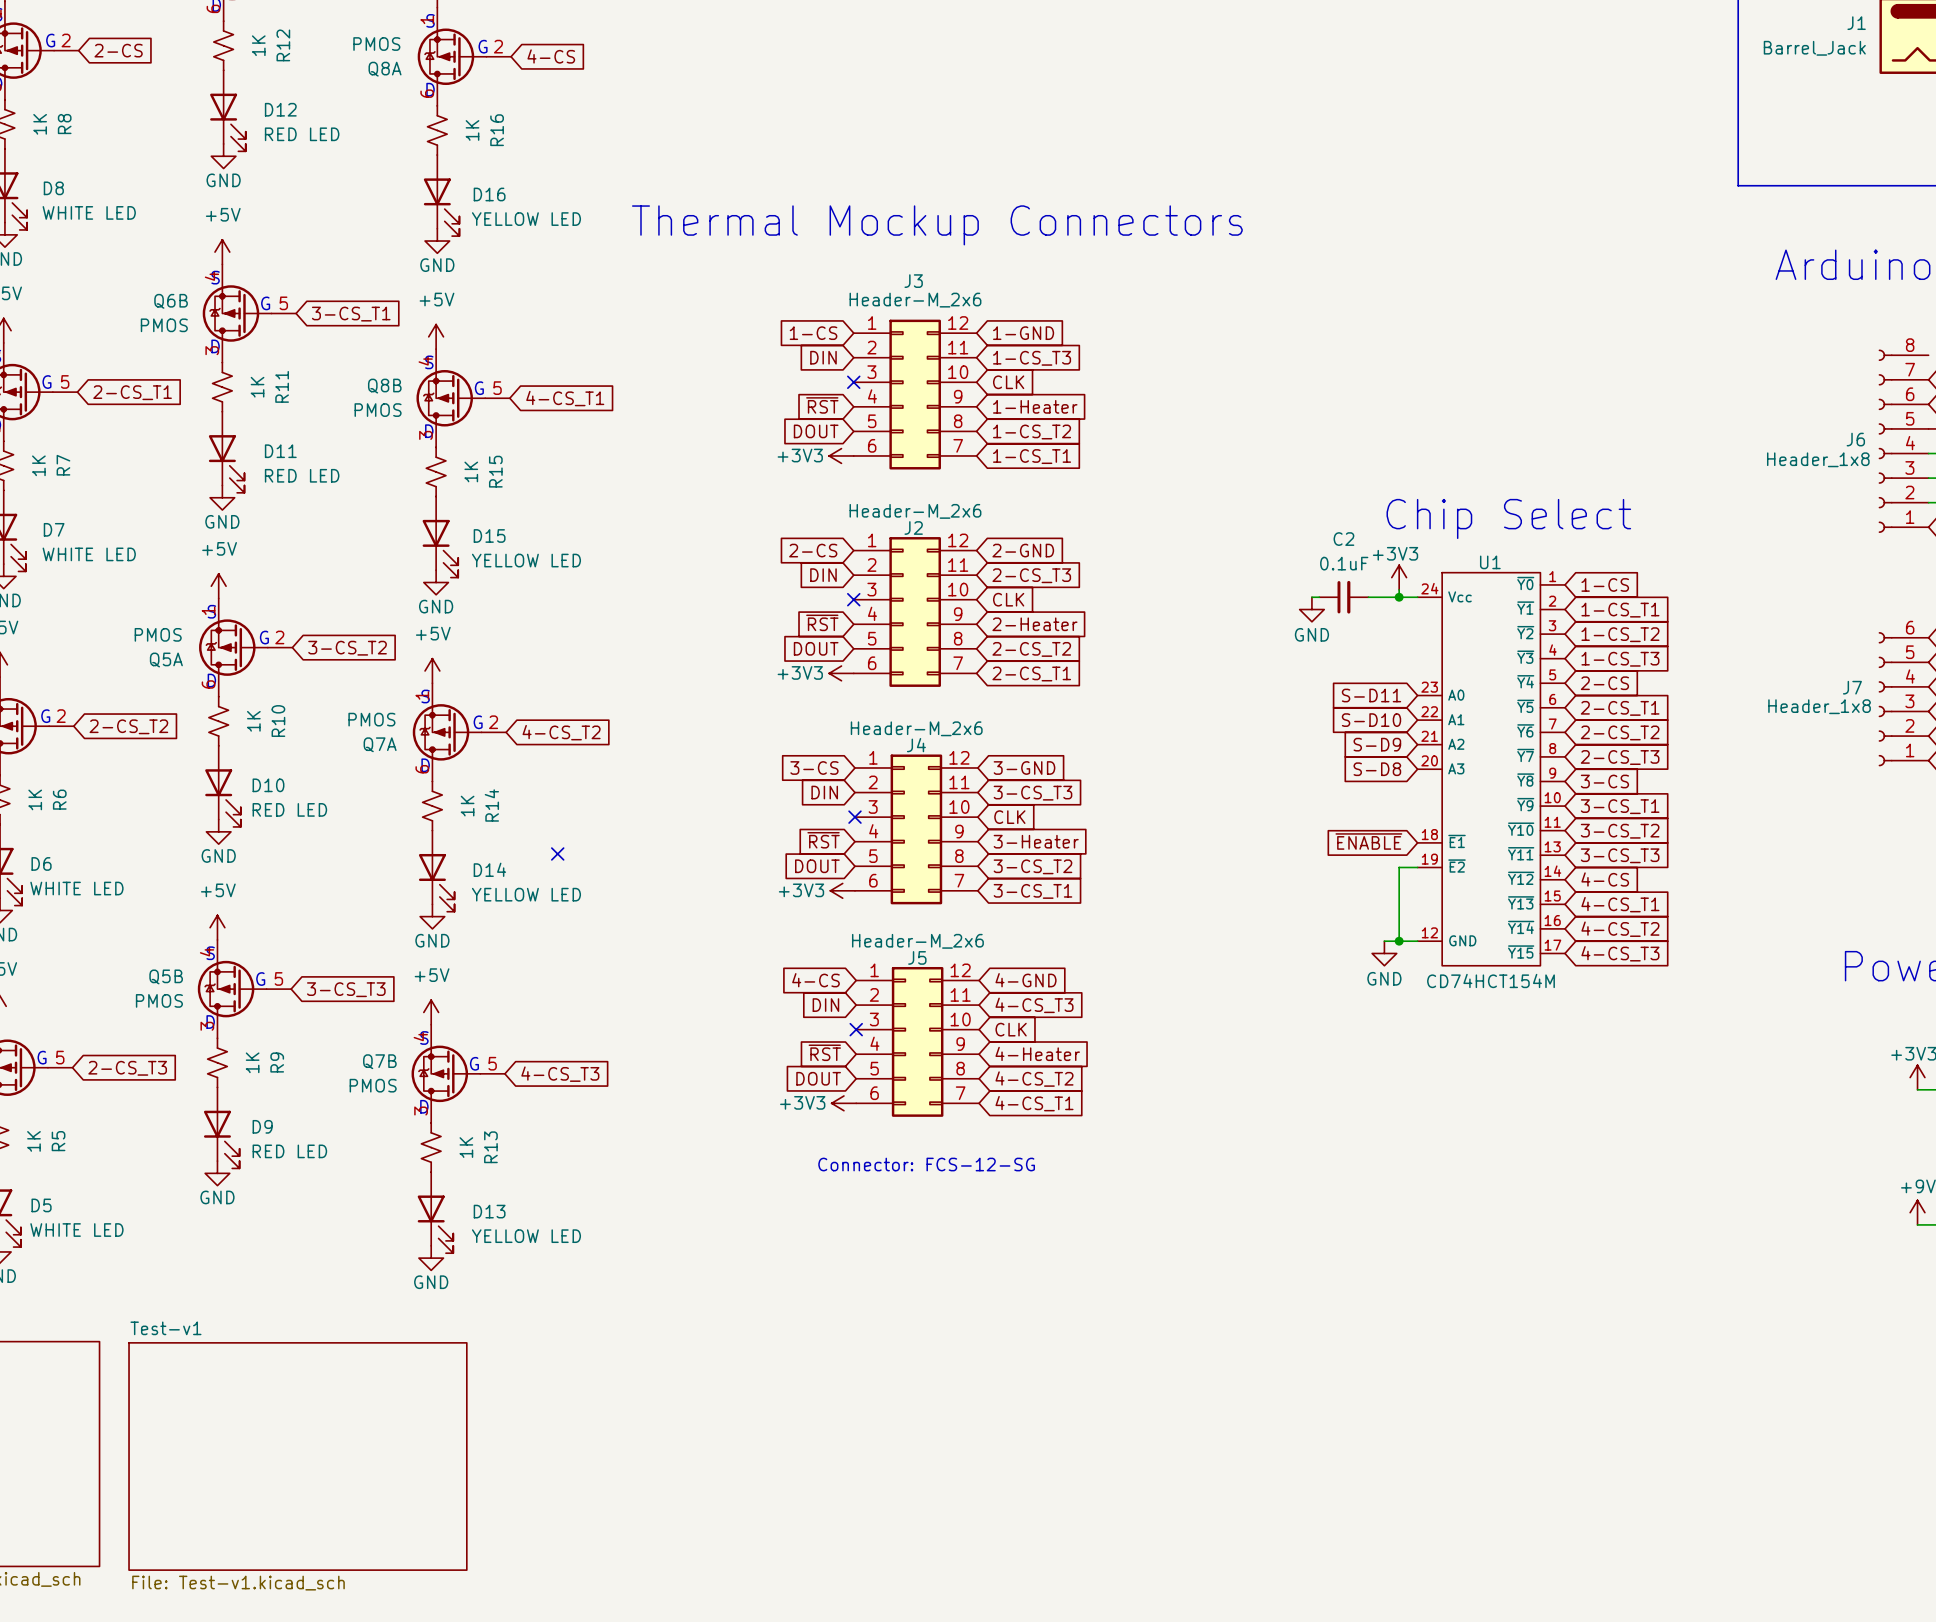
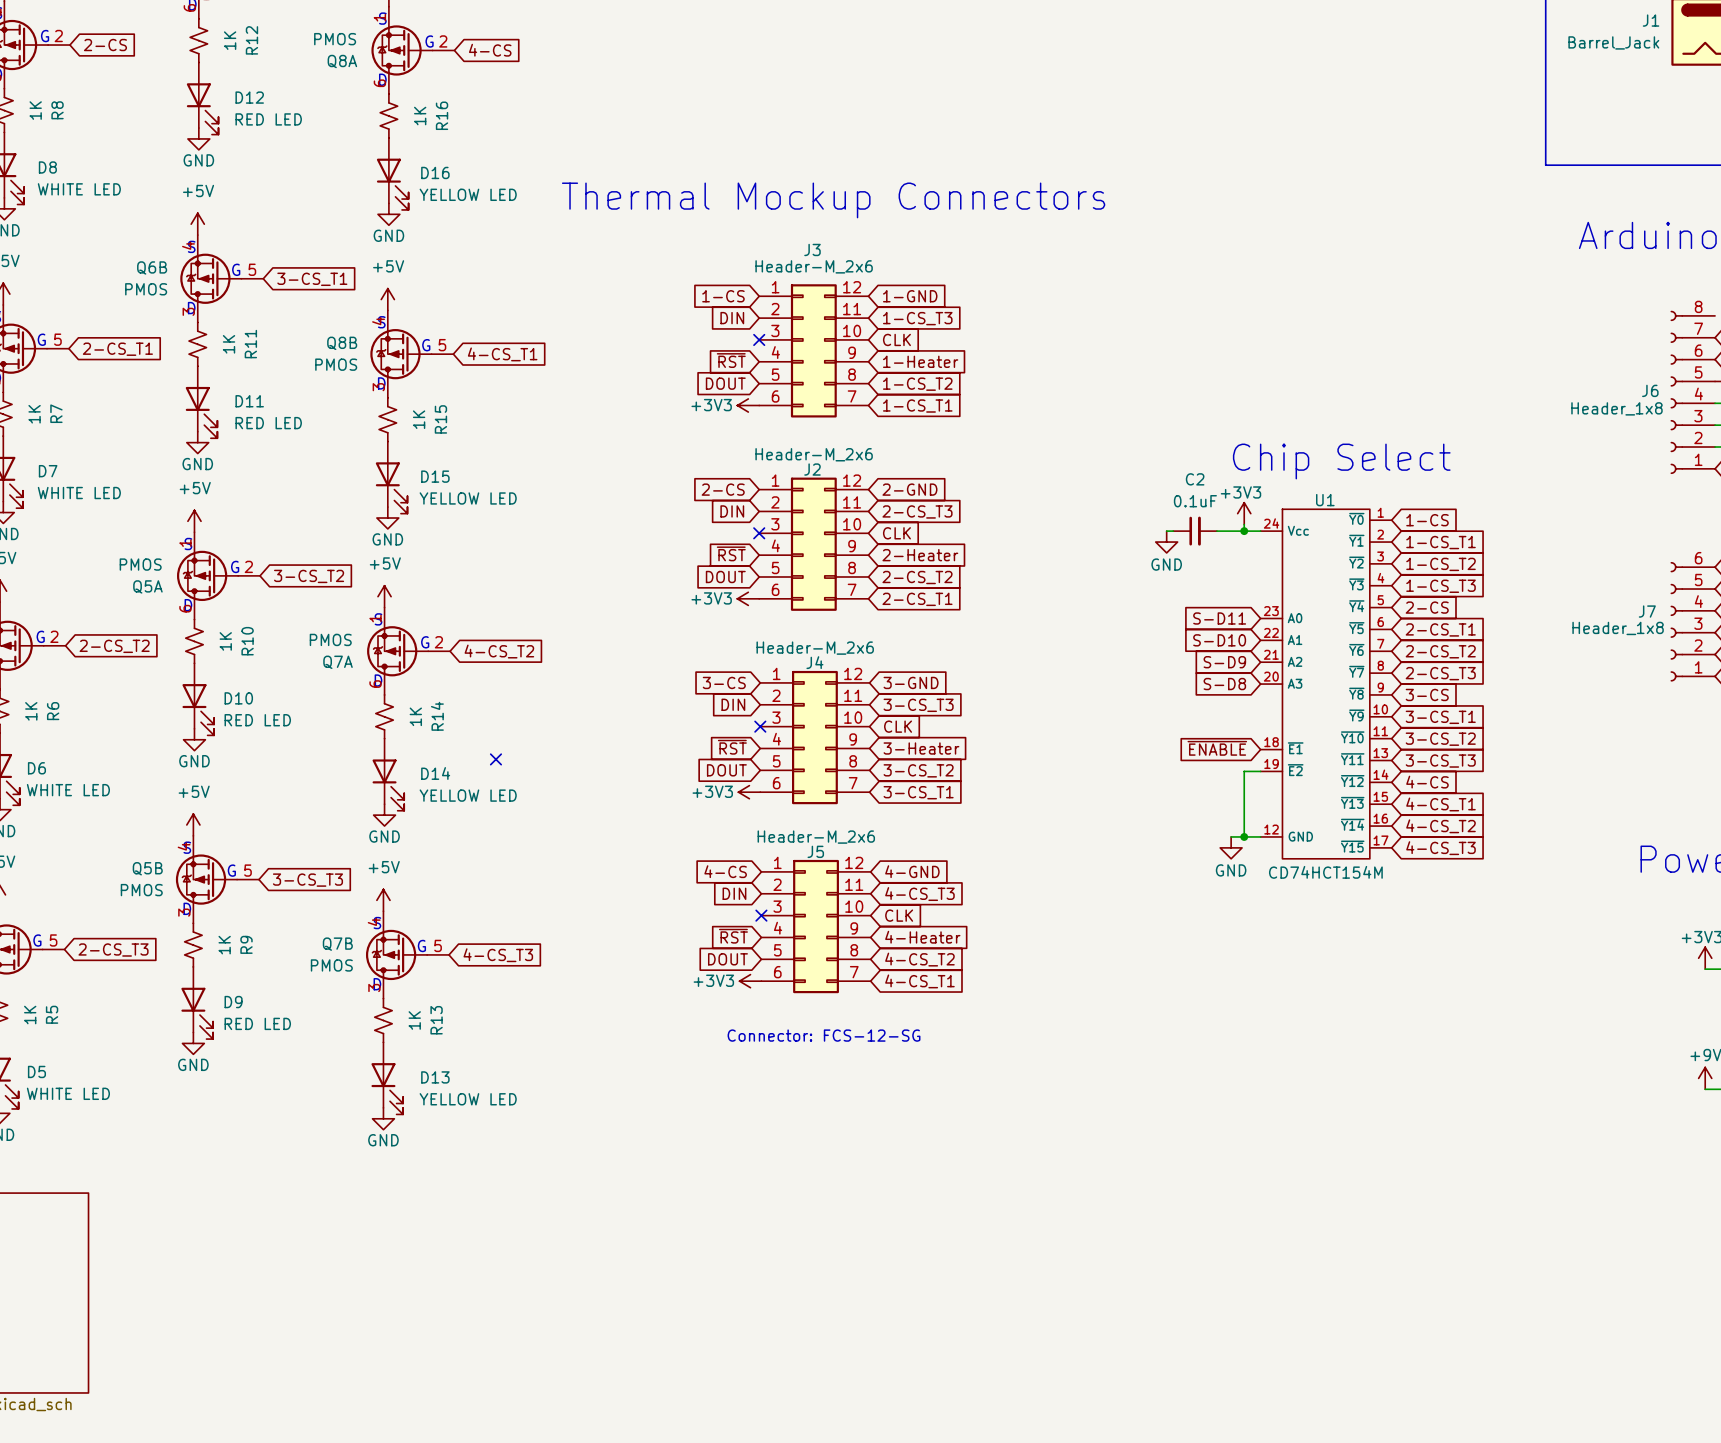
sheet Test-v1: File: Test-v1.kicad_sch (297, 1456) -> none

